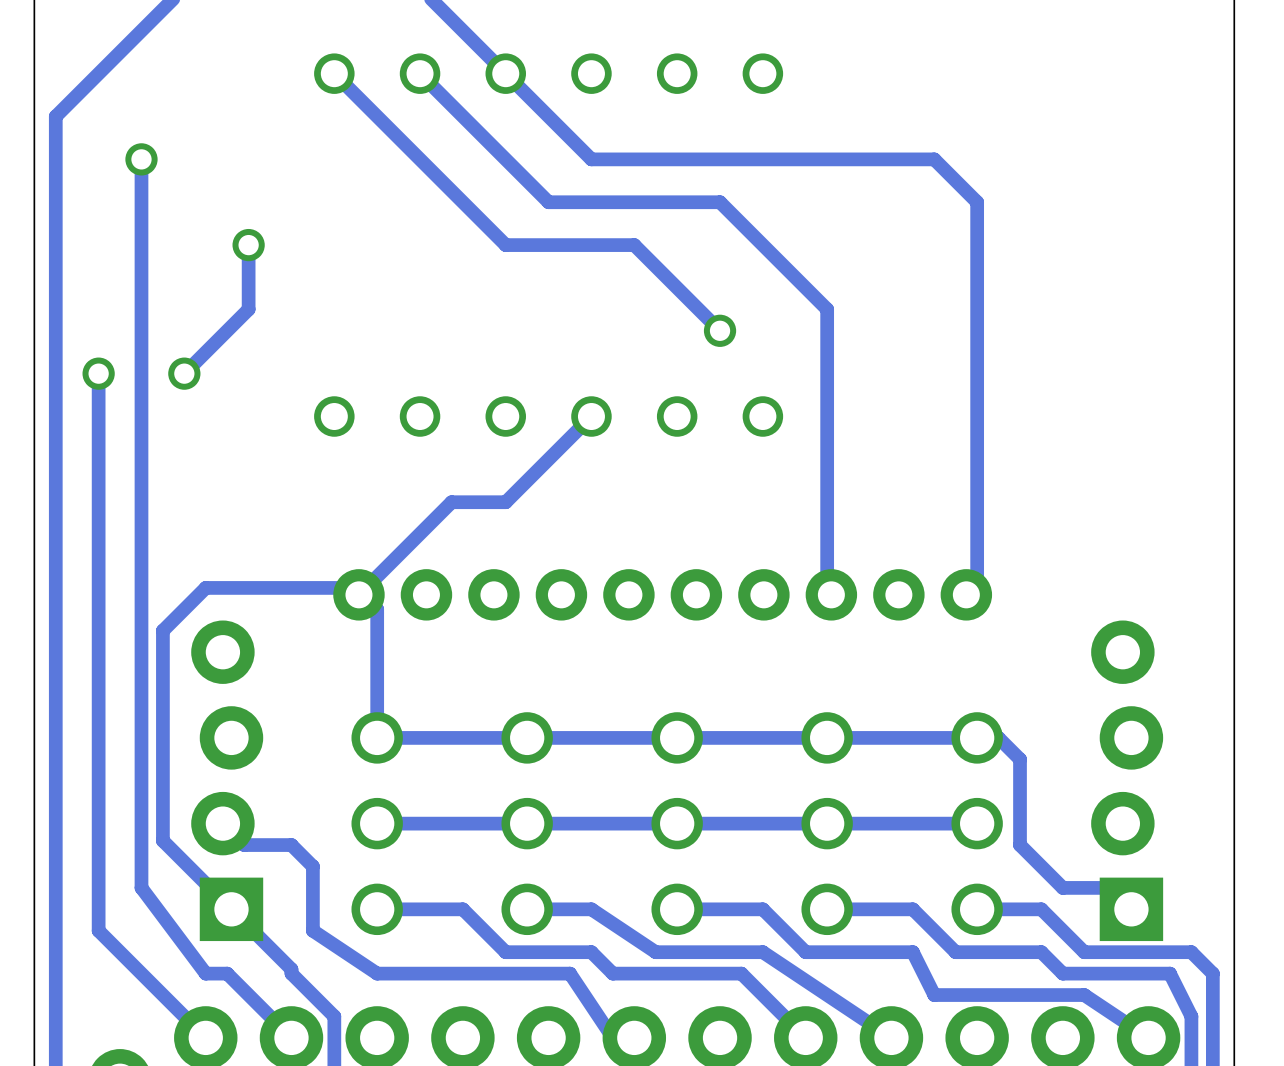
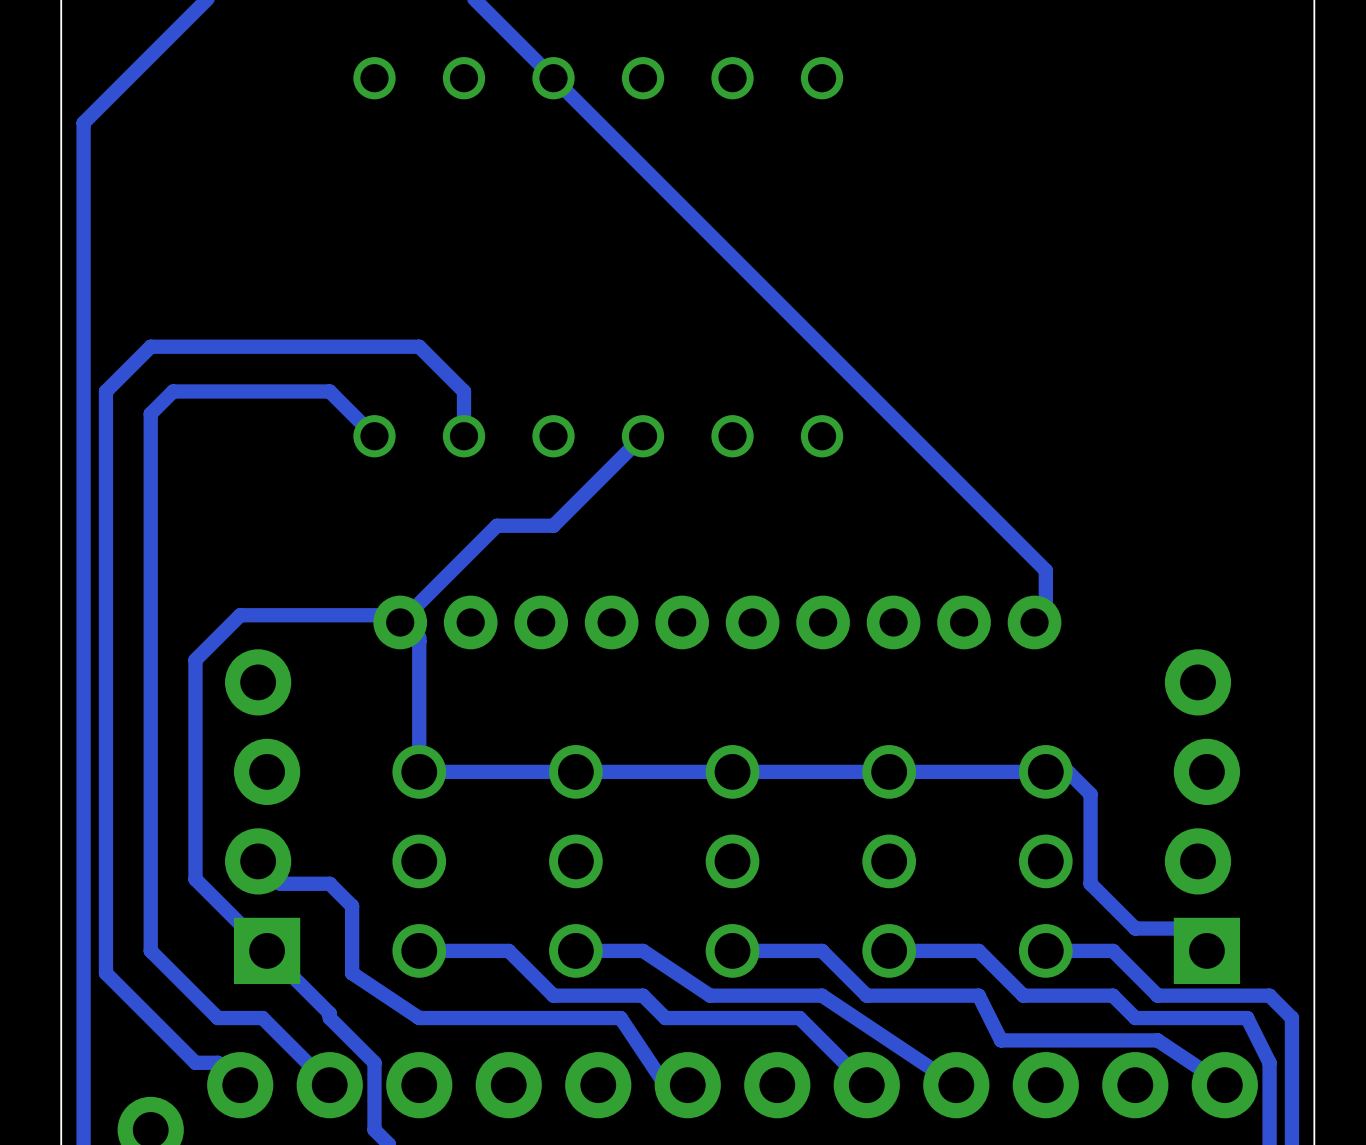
track: (334, 73) (505, 245) (634, 245) (720, 330) -> none
track: (420, 73) (548, 202) (720, 202) (827, 309) (827, 590) (831, 594) -> none
track: (141, 159) (141, 887) (205, 973) -> (374, 436) (329, 391) (173, 391) (150, 413) (150, 950) (217, 1018) (240, 1018)
via: (141, 159) -> none
track: (591, 159) (934, 159) (977, 202) (977, 545) -> (643, 167) (1045, 570)
track: (248, 245) (248, 309) (184, 373) -> none
via: (248, 245) -> none
via: (720, 330) -> none
track: (98, 373) (98, 930) (184, 1016) -> (464, 436) (464, 391) (419, 346) (150, 346) (105, 391) (105, 973) (195, 1062) (217, 1062)
via: (98, 373) -> none
via: (184, 373) -> none
track: (977, 823) (377, 823) -> none

